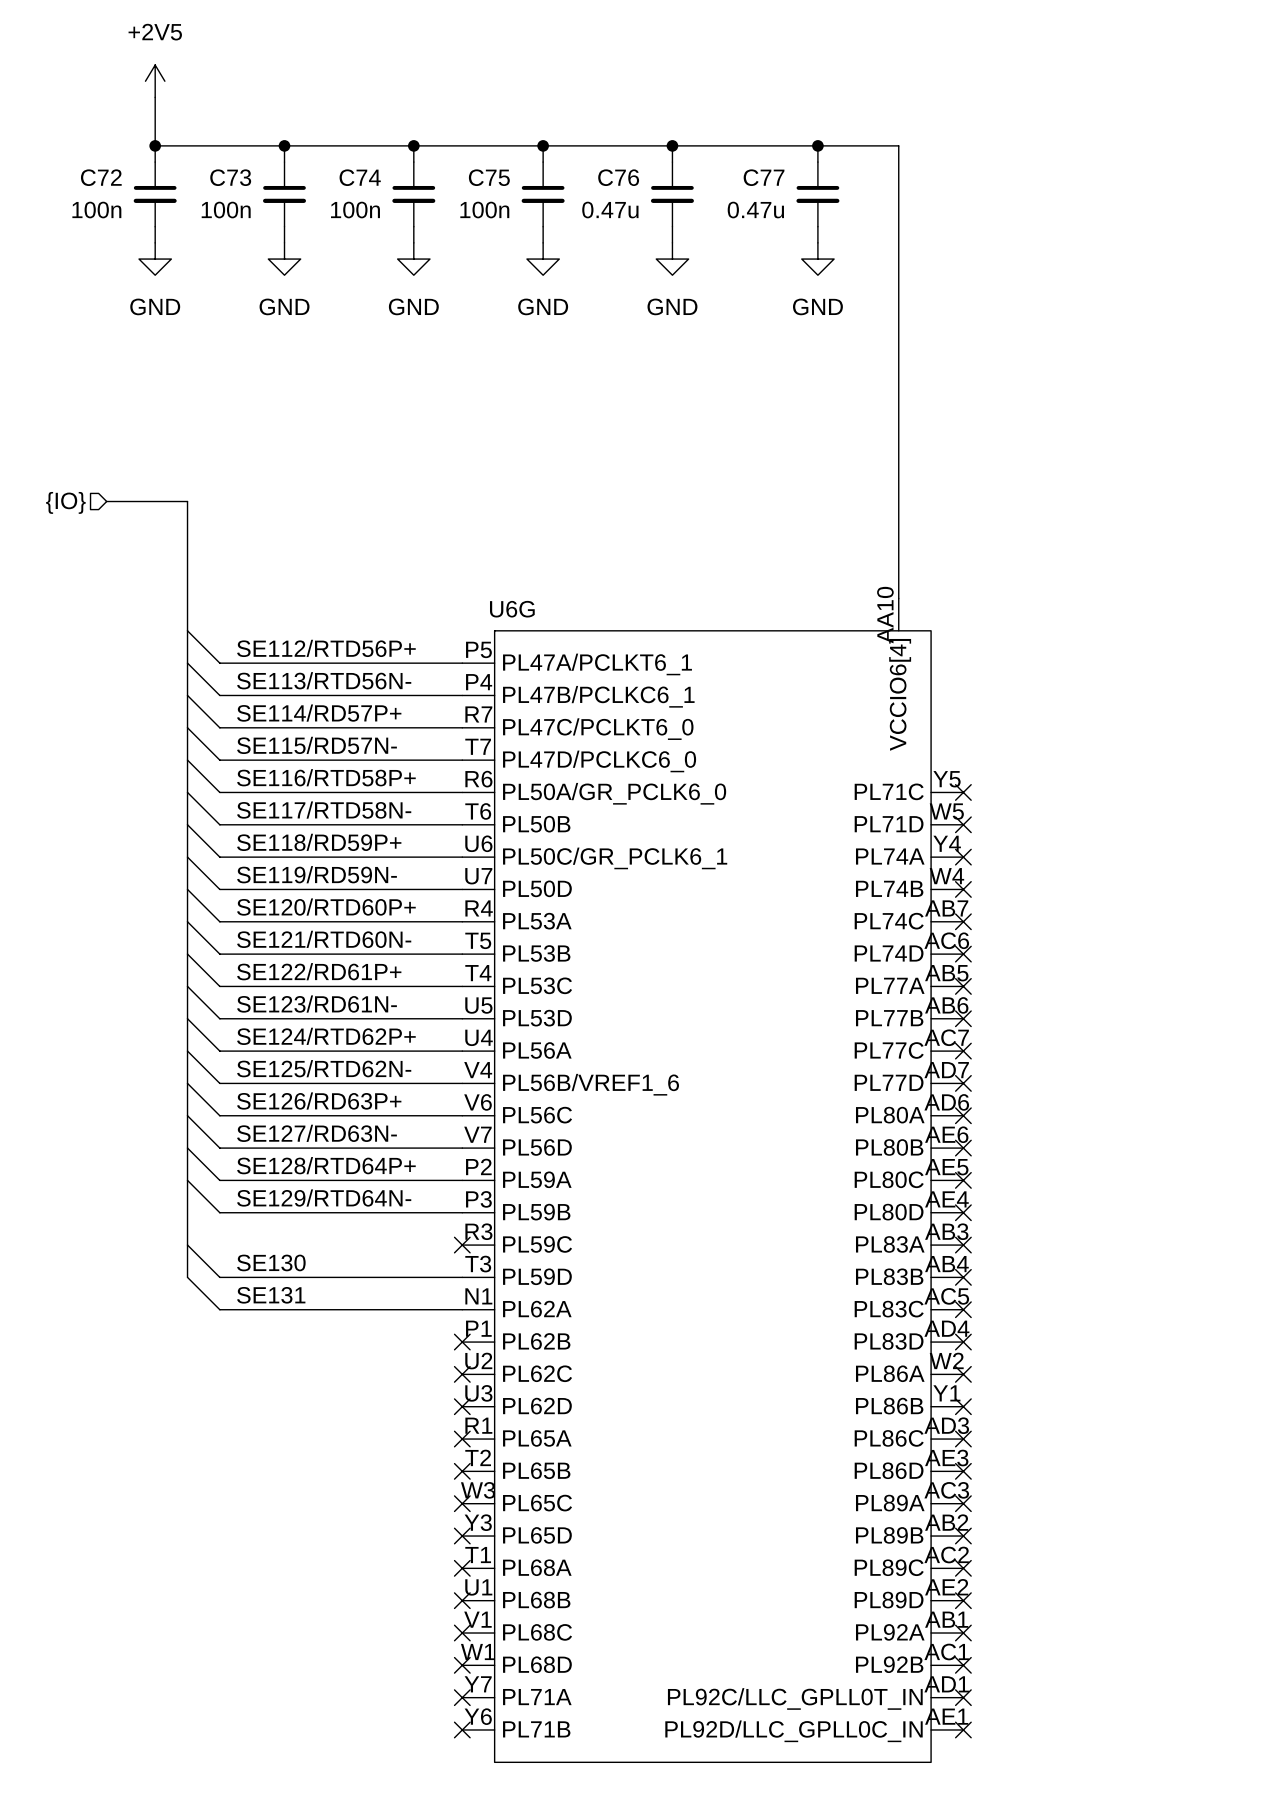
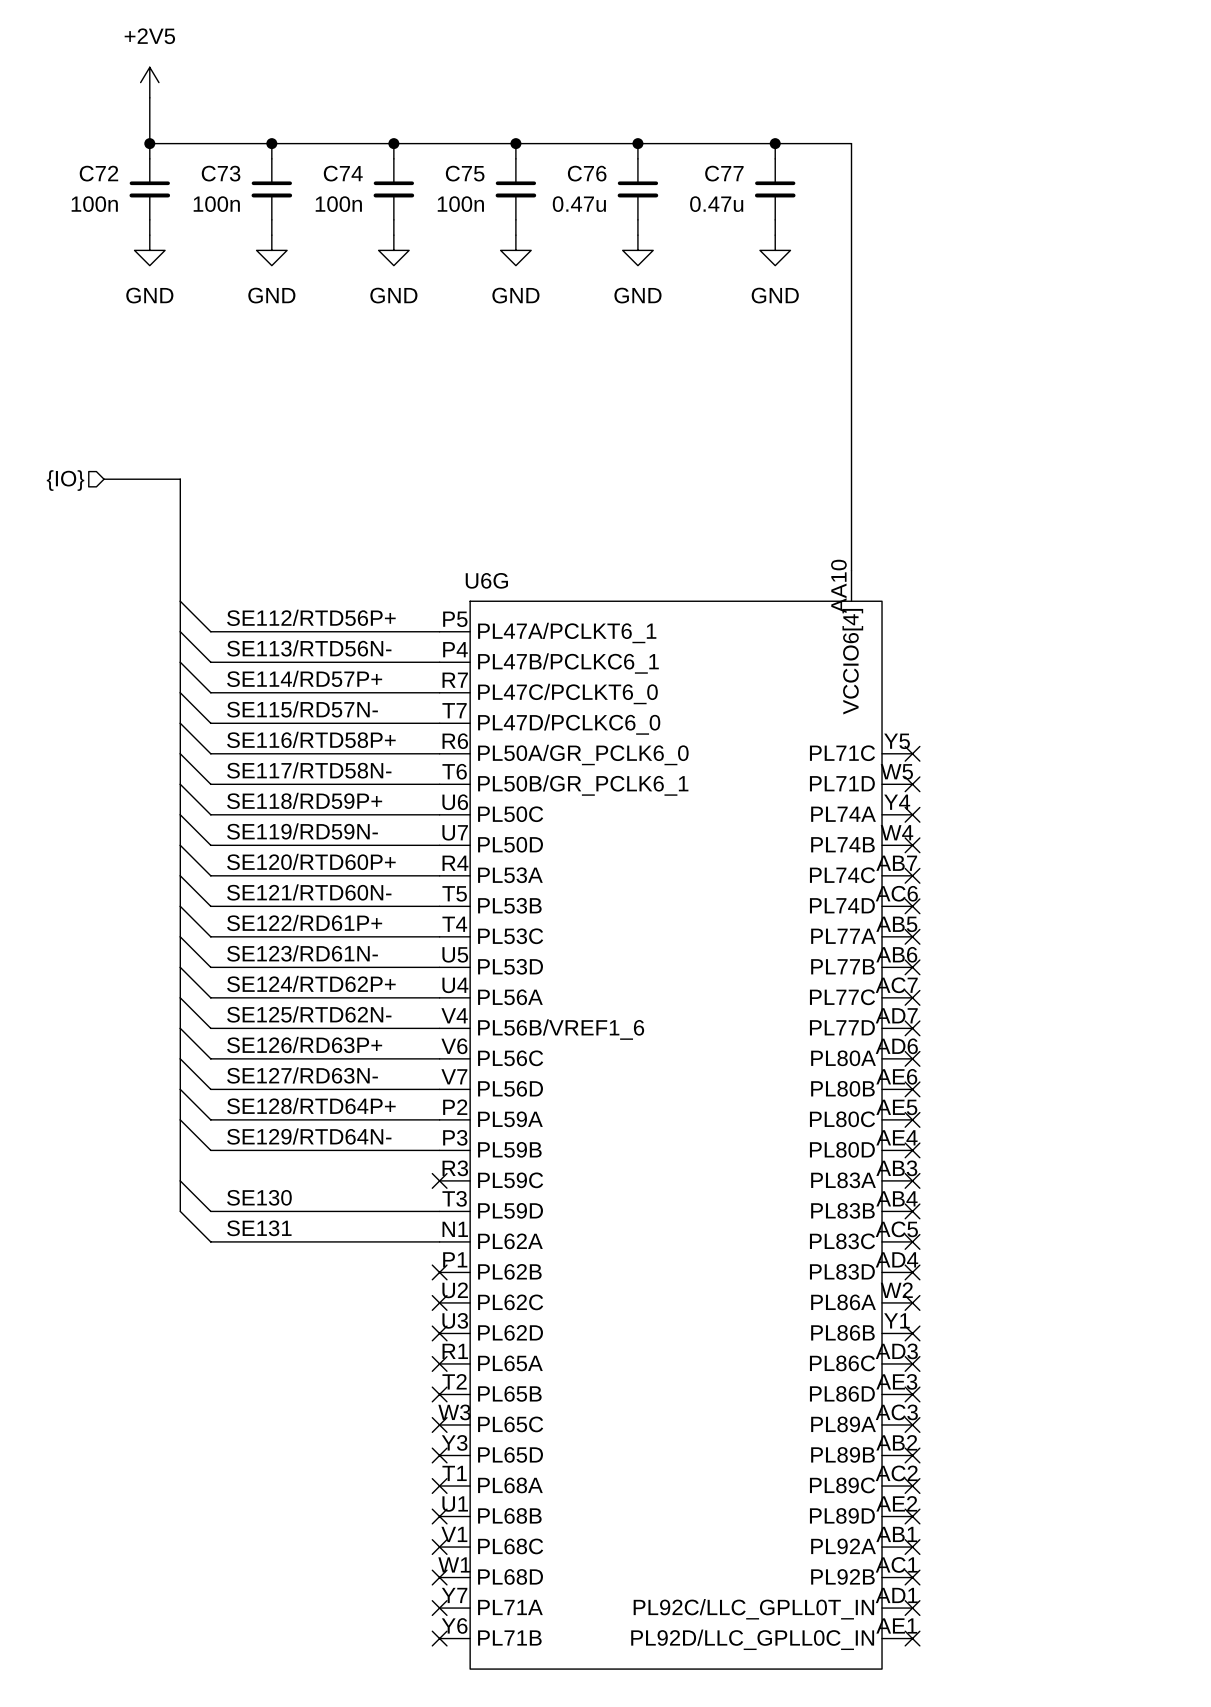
U6G pin name: PL50B (536, 824) -> PL50B/GR_PCLK6_1 (583, 785)
U6G pin name: PL50C/GR_PCLK6_1 (615, 858) -> PL50C (510, 814)

